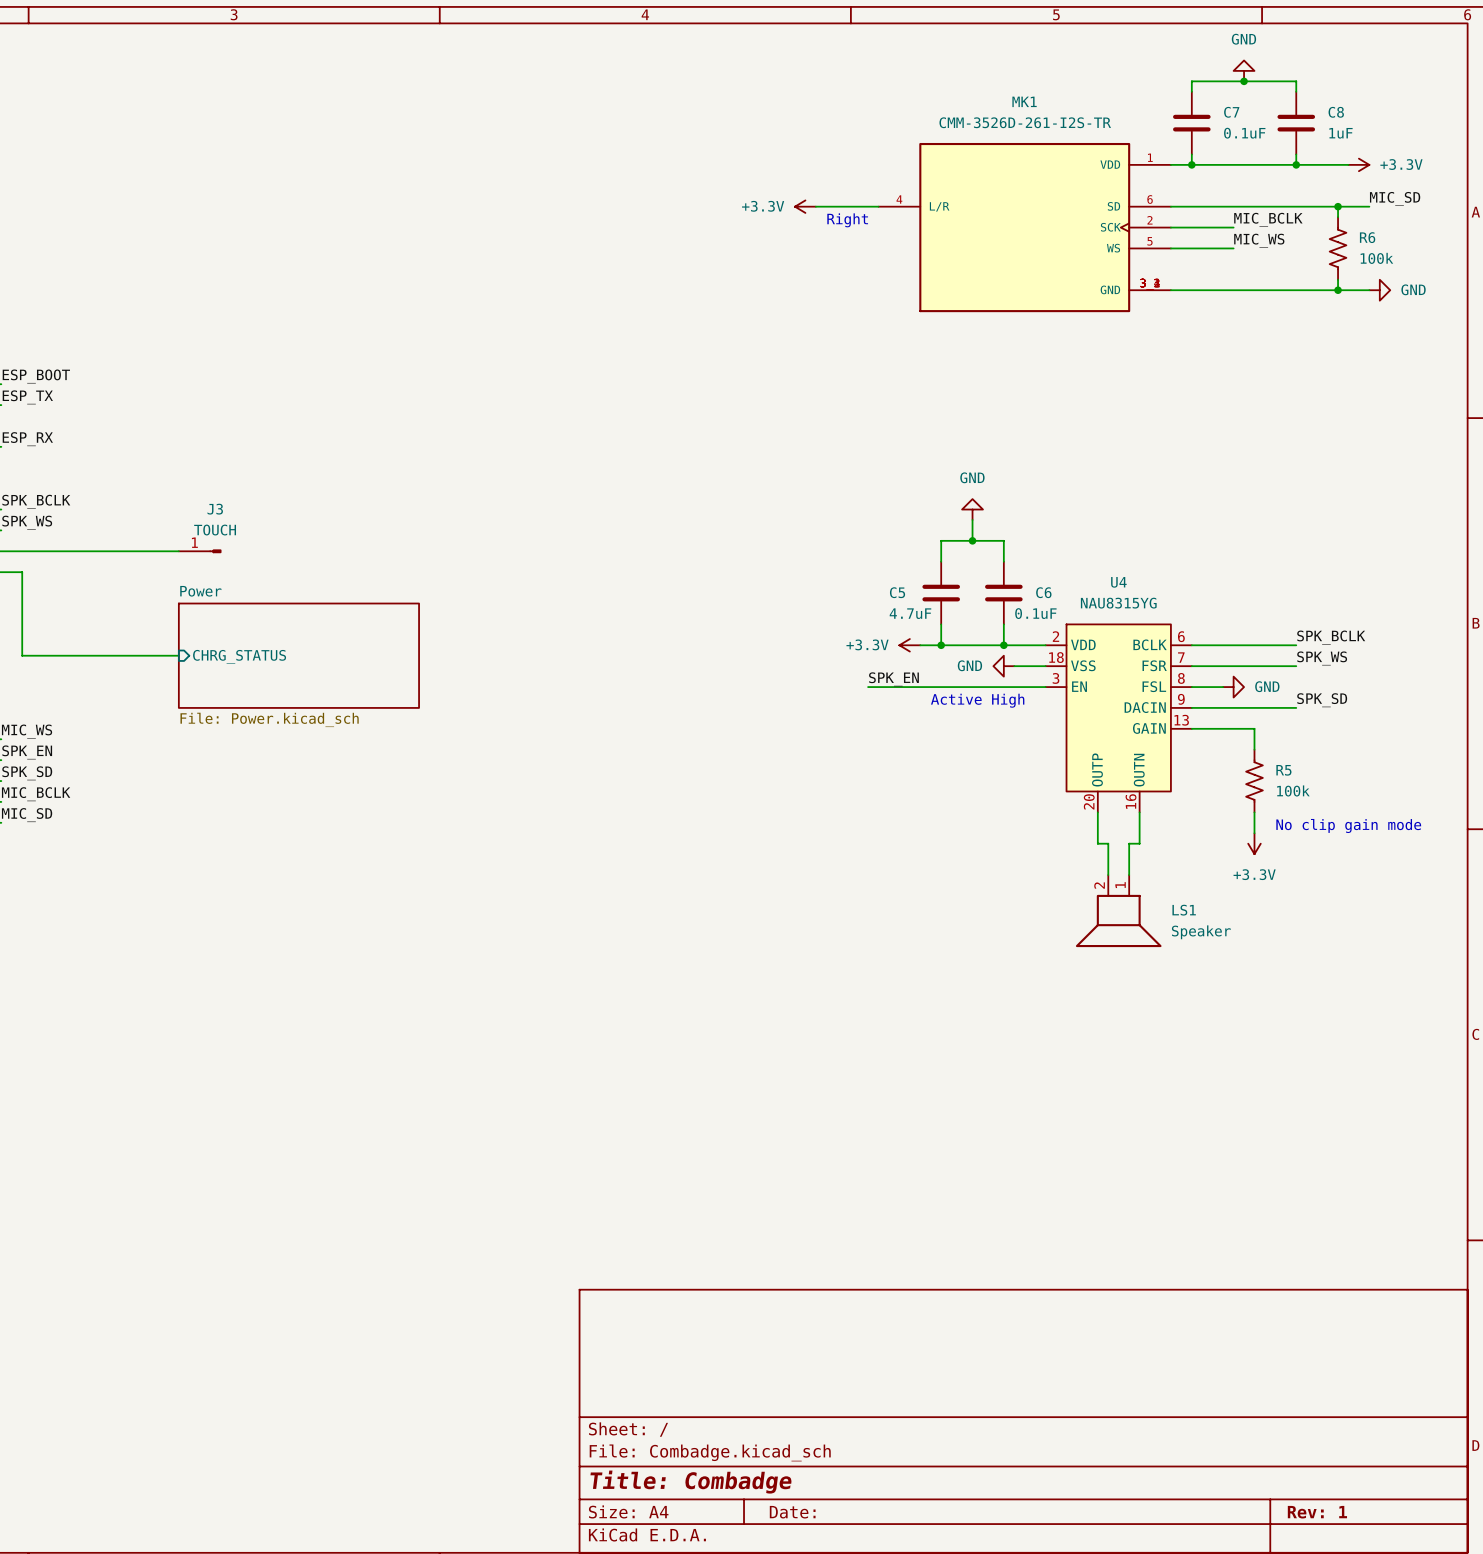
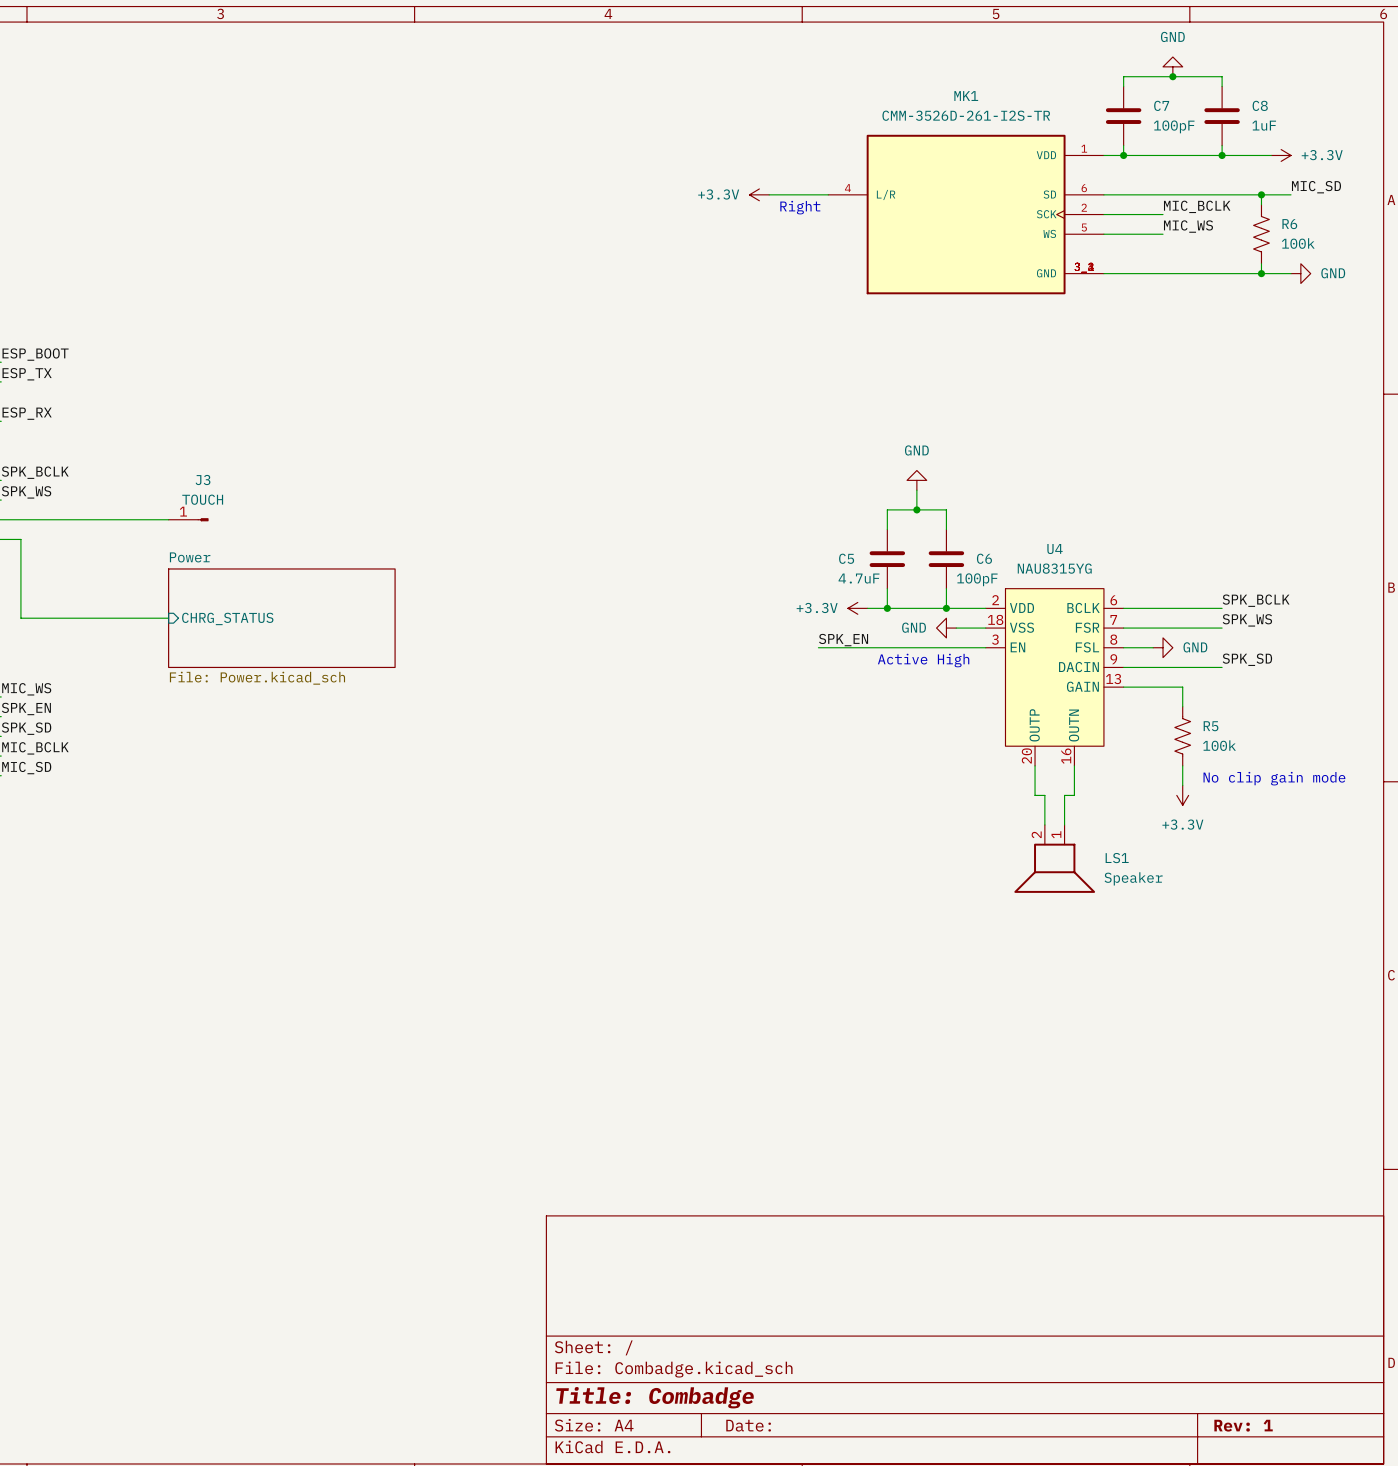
C7 value: 0.1uF (1244, 133) -> 100pF (1174, 126)
C6 value: 0.1uF (1035, 613) -> 100pF (977, 579)

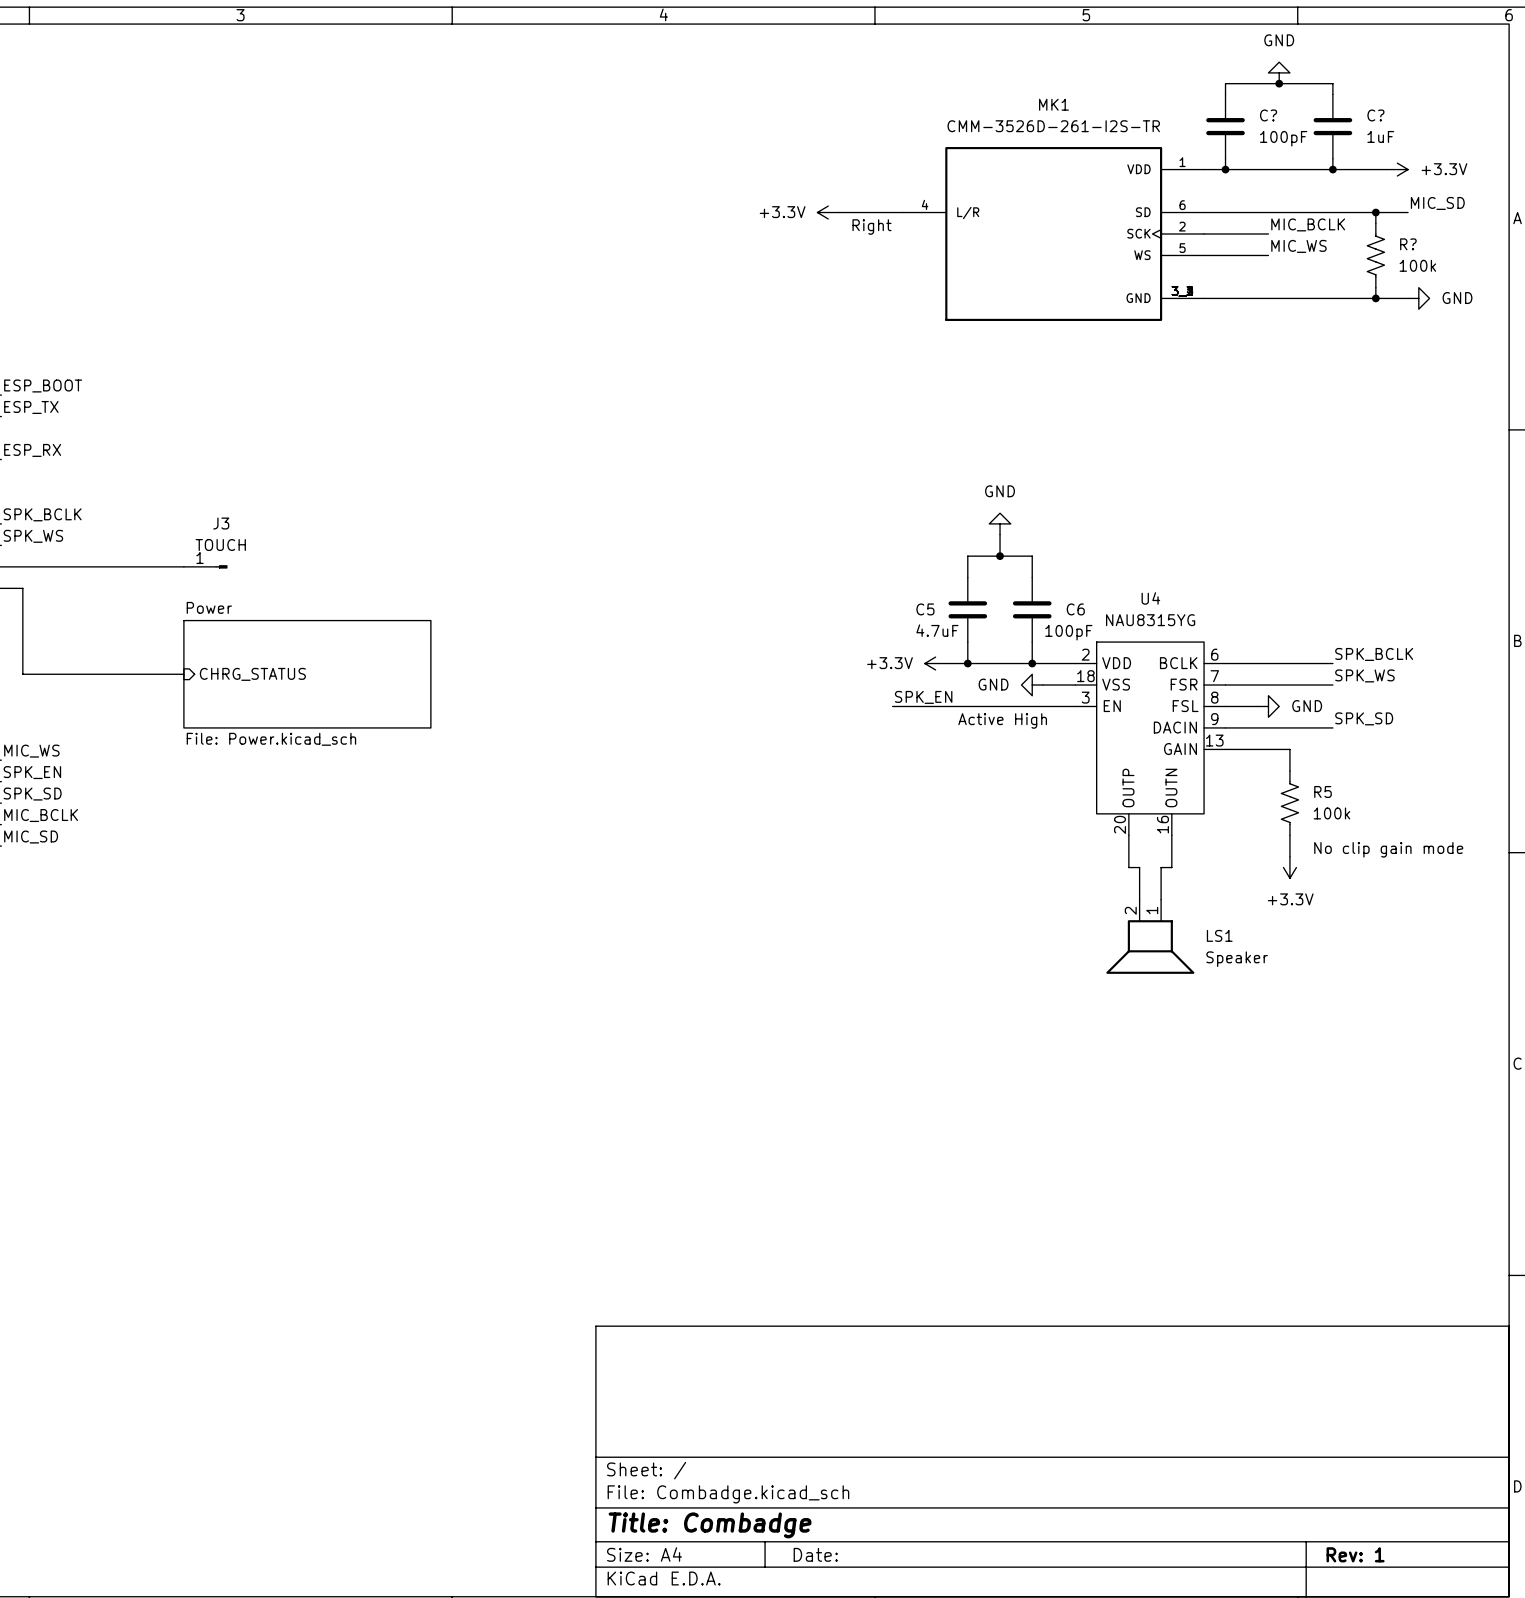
C7 name: C7 (1161, 105) -> C? (1268, 115)
C8 name: C8 (1260, 105) -> C? (1375, 115)
R6 name: R6 (1289, 224) -> R? (1408, 244)

